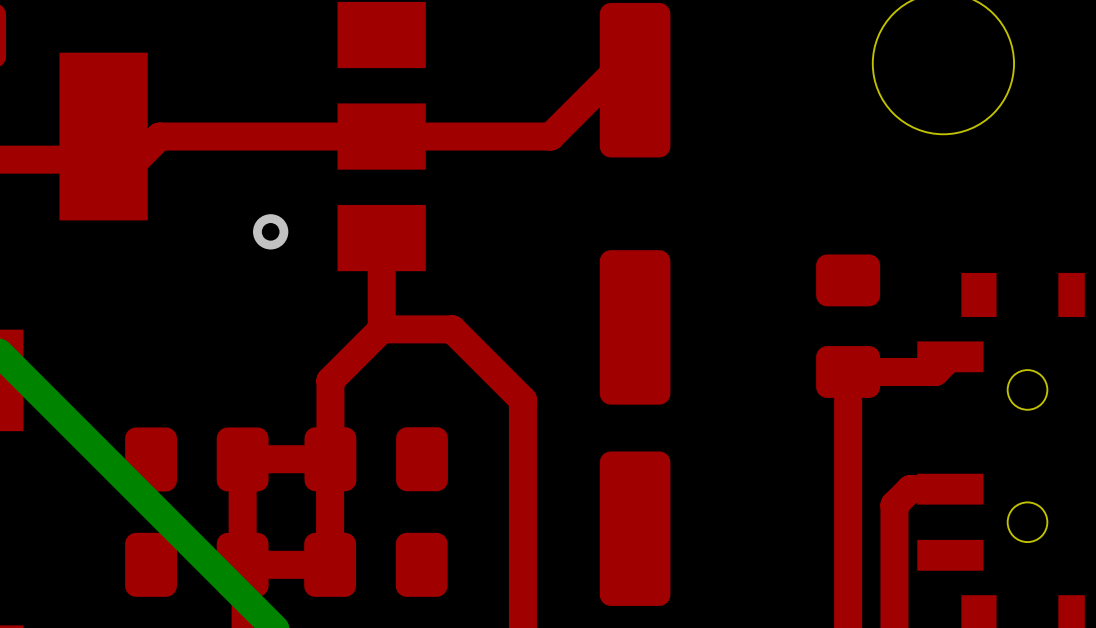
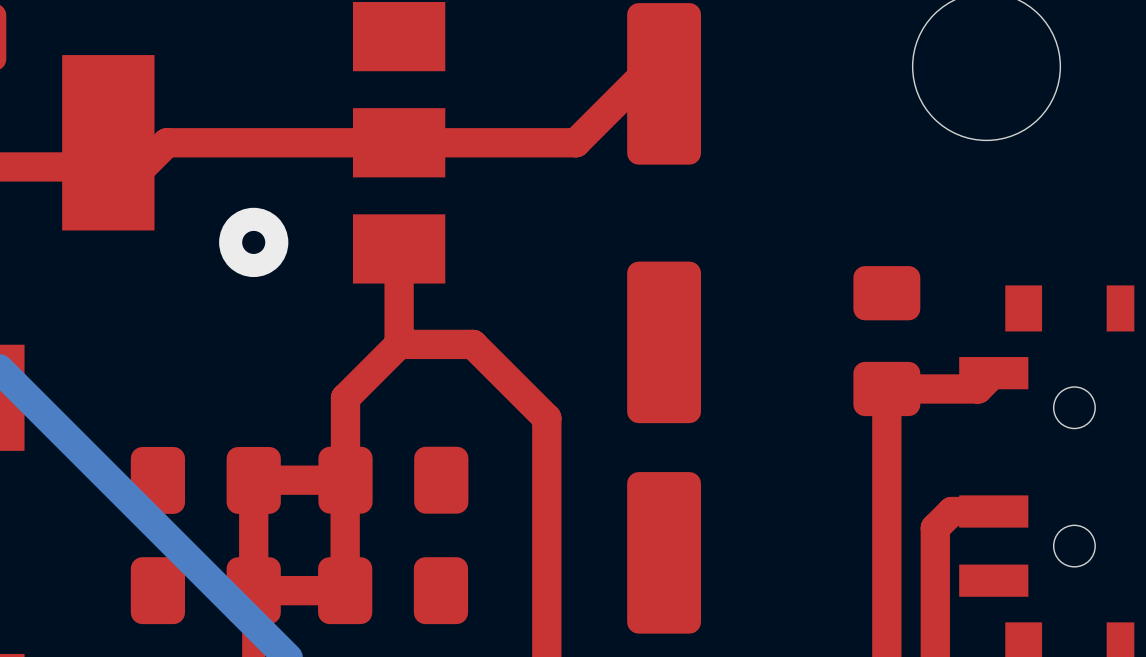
via size: [253, 214, 289, 250] -> [219, 207, 289, 278]

